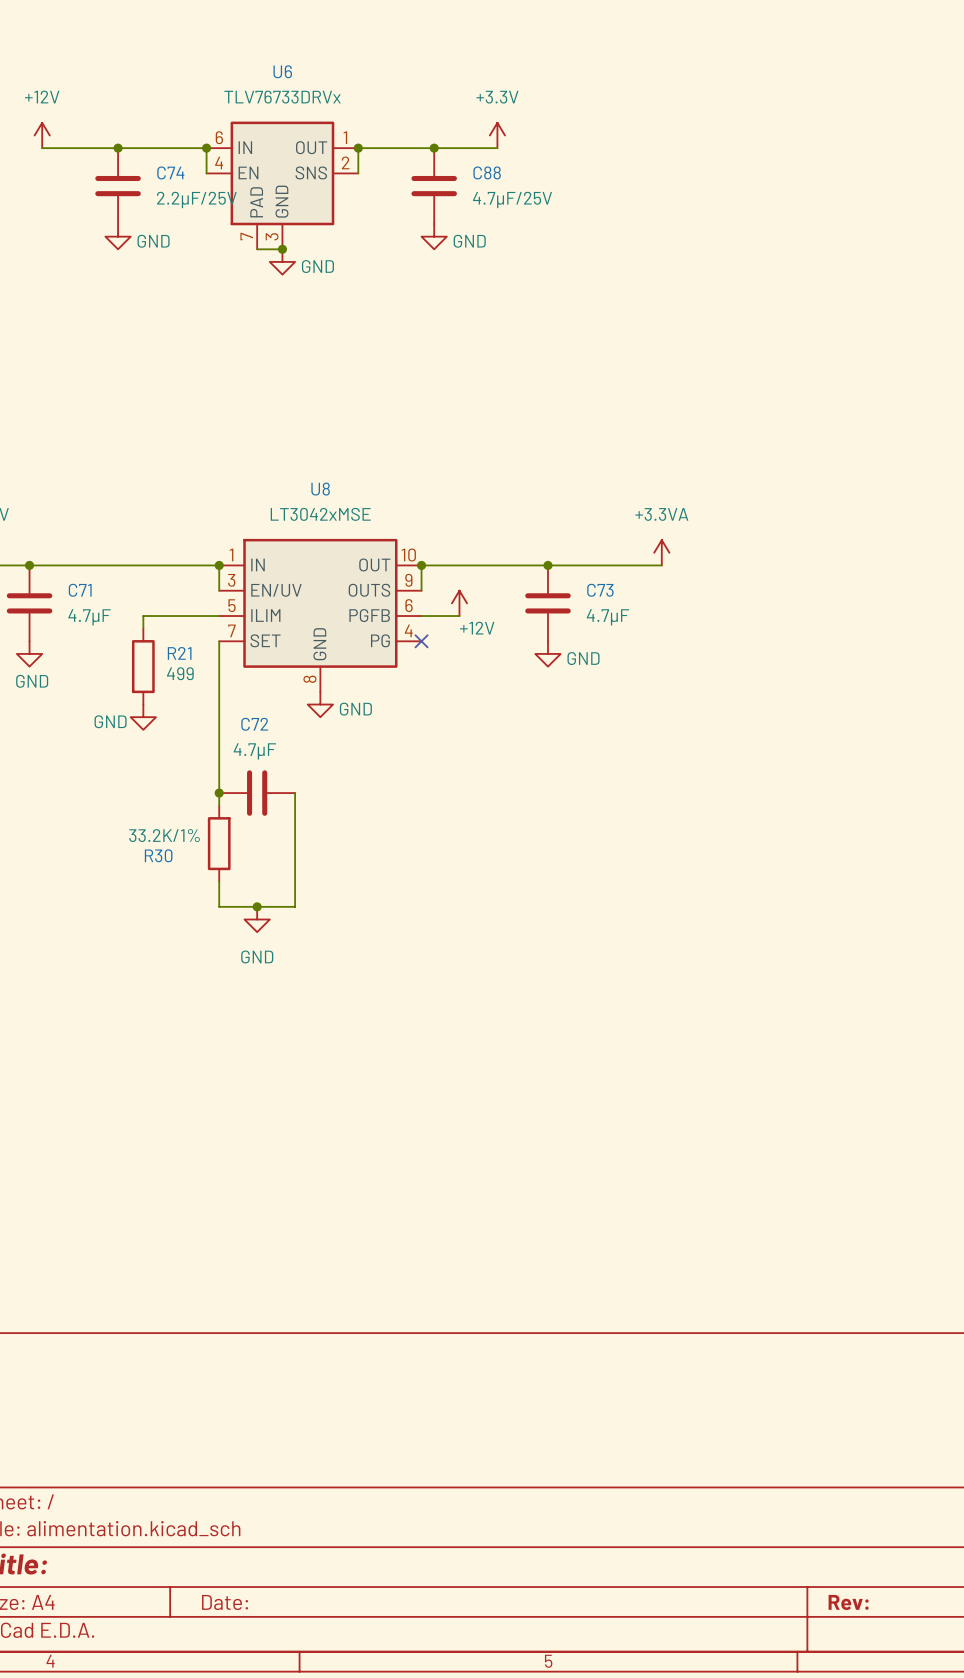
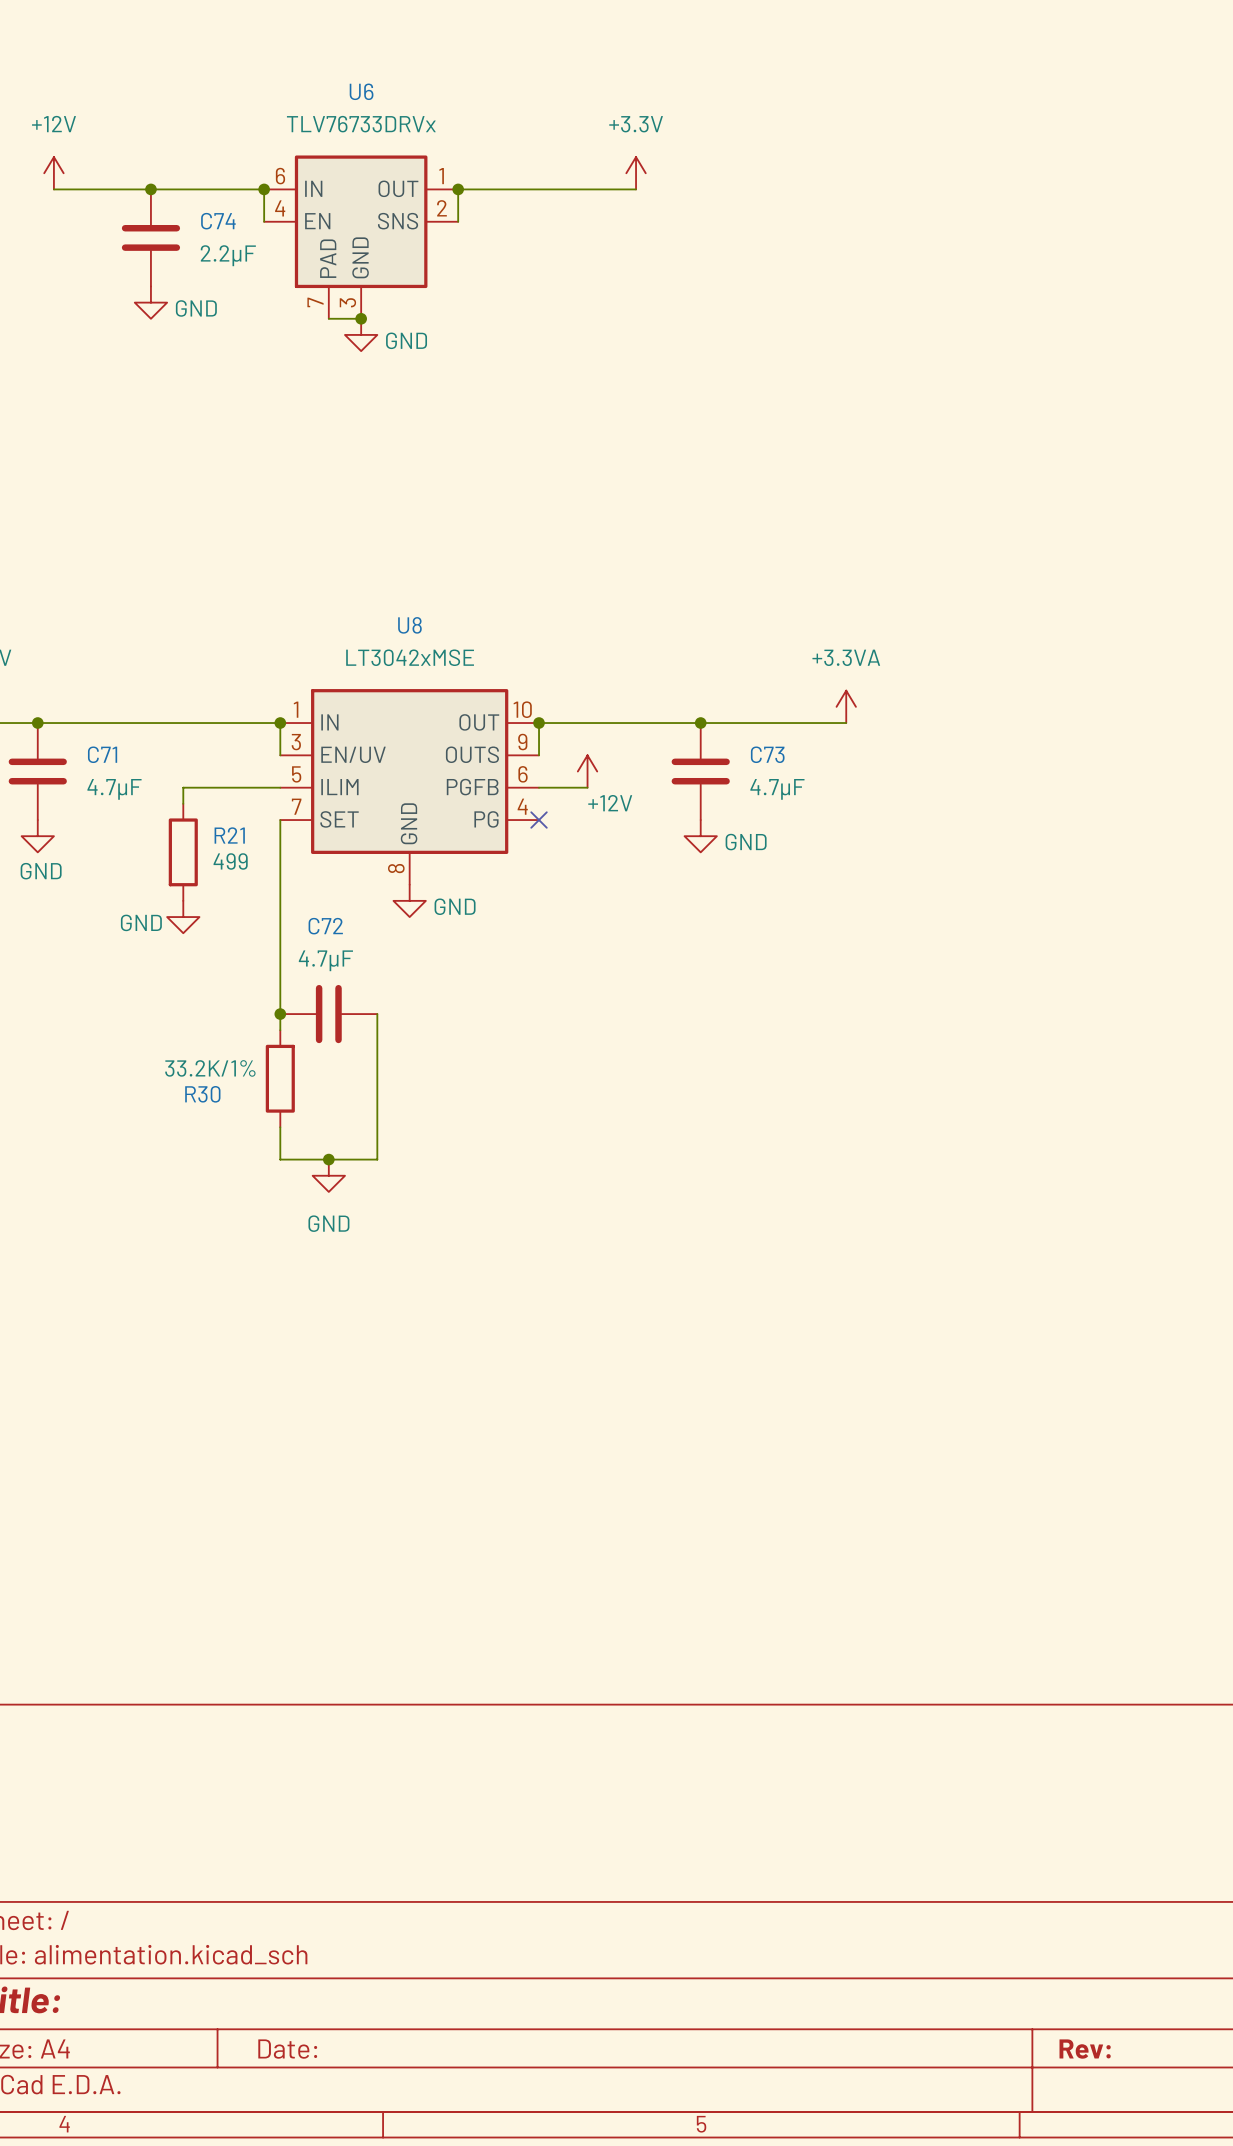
junction: (434, 148) -> none
C88: 4.7µF/25V (434, 186) -> none
C74 value: 2.2µF/25V (196, 199) -> 2.2µF (228, 255)
power symbol: GND (434, 236) -> none

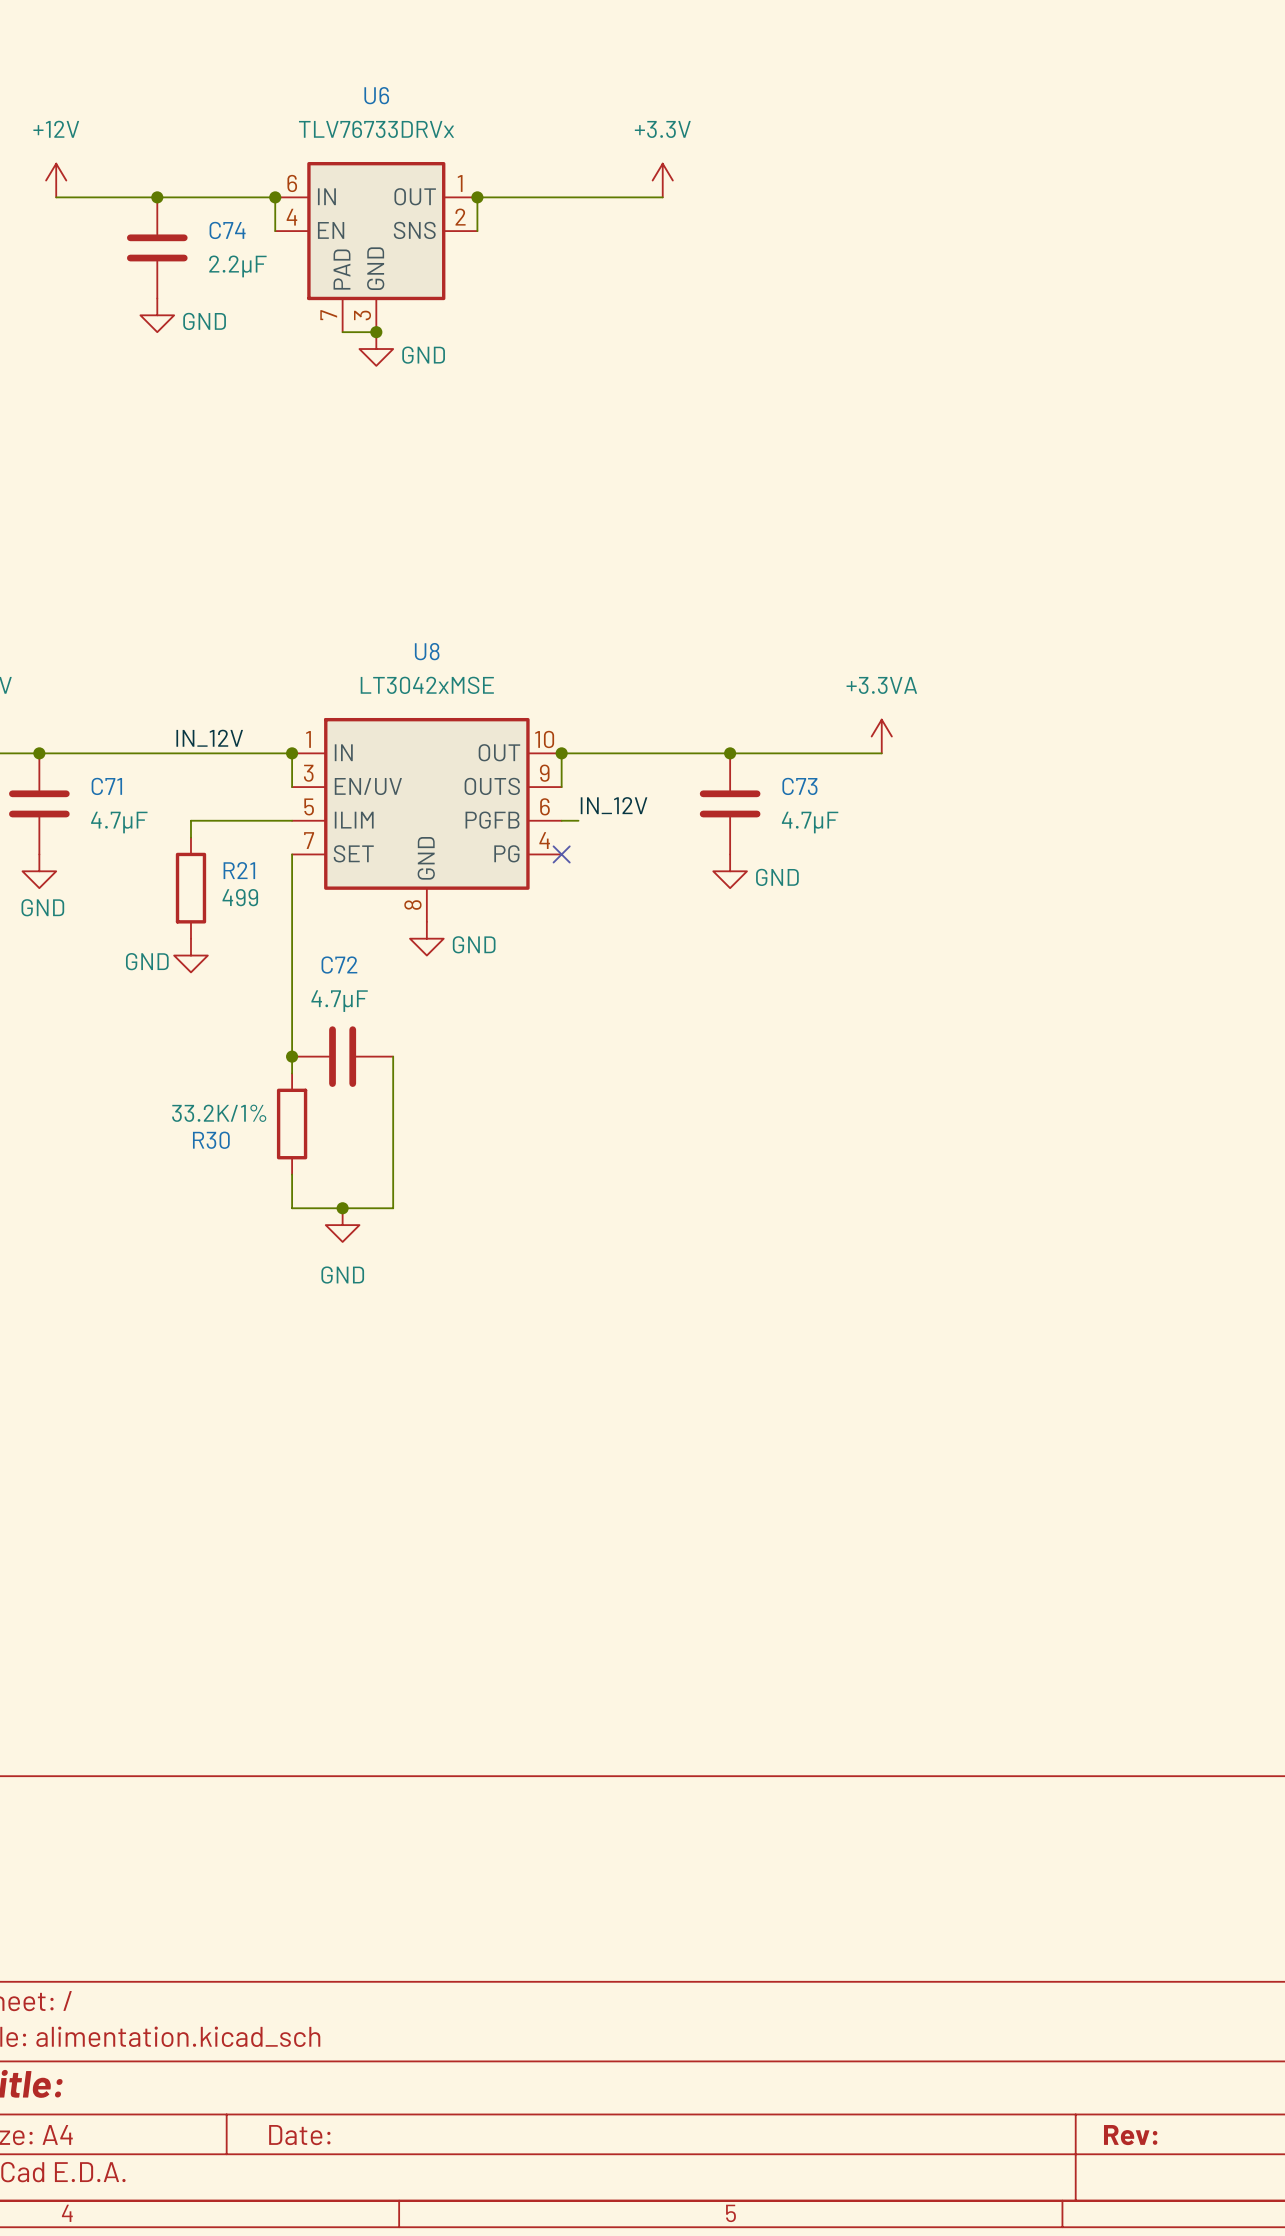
label: none -> IN_12V (209, 738)
power symbol: +12V (587, 771) -> none
label: none -> IN_12V (614, 805)
wire: (555, 787) (587, 787) -> none

